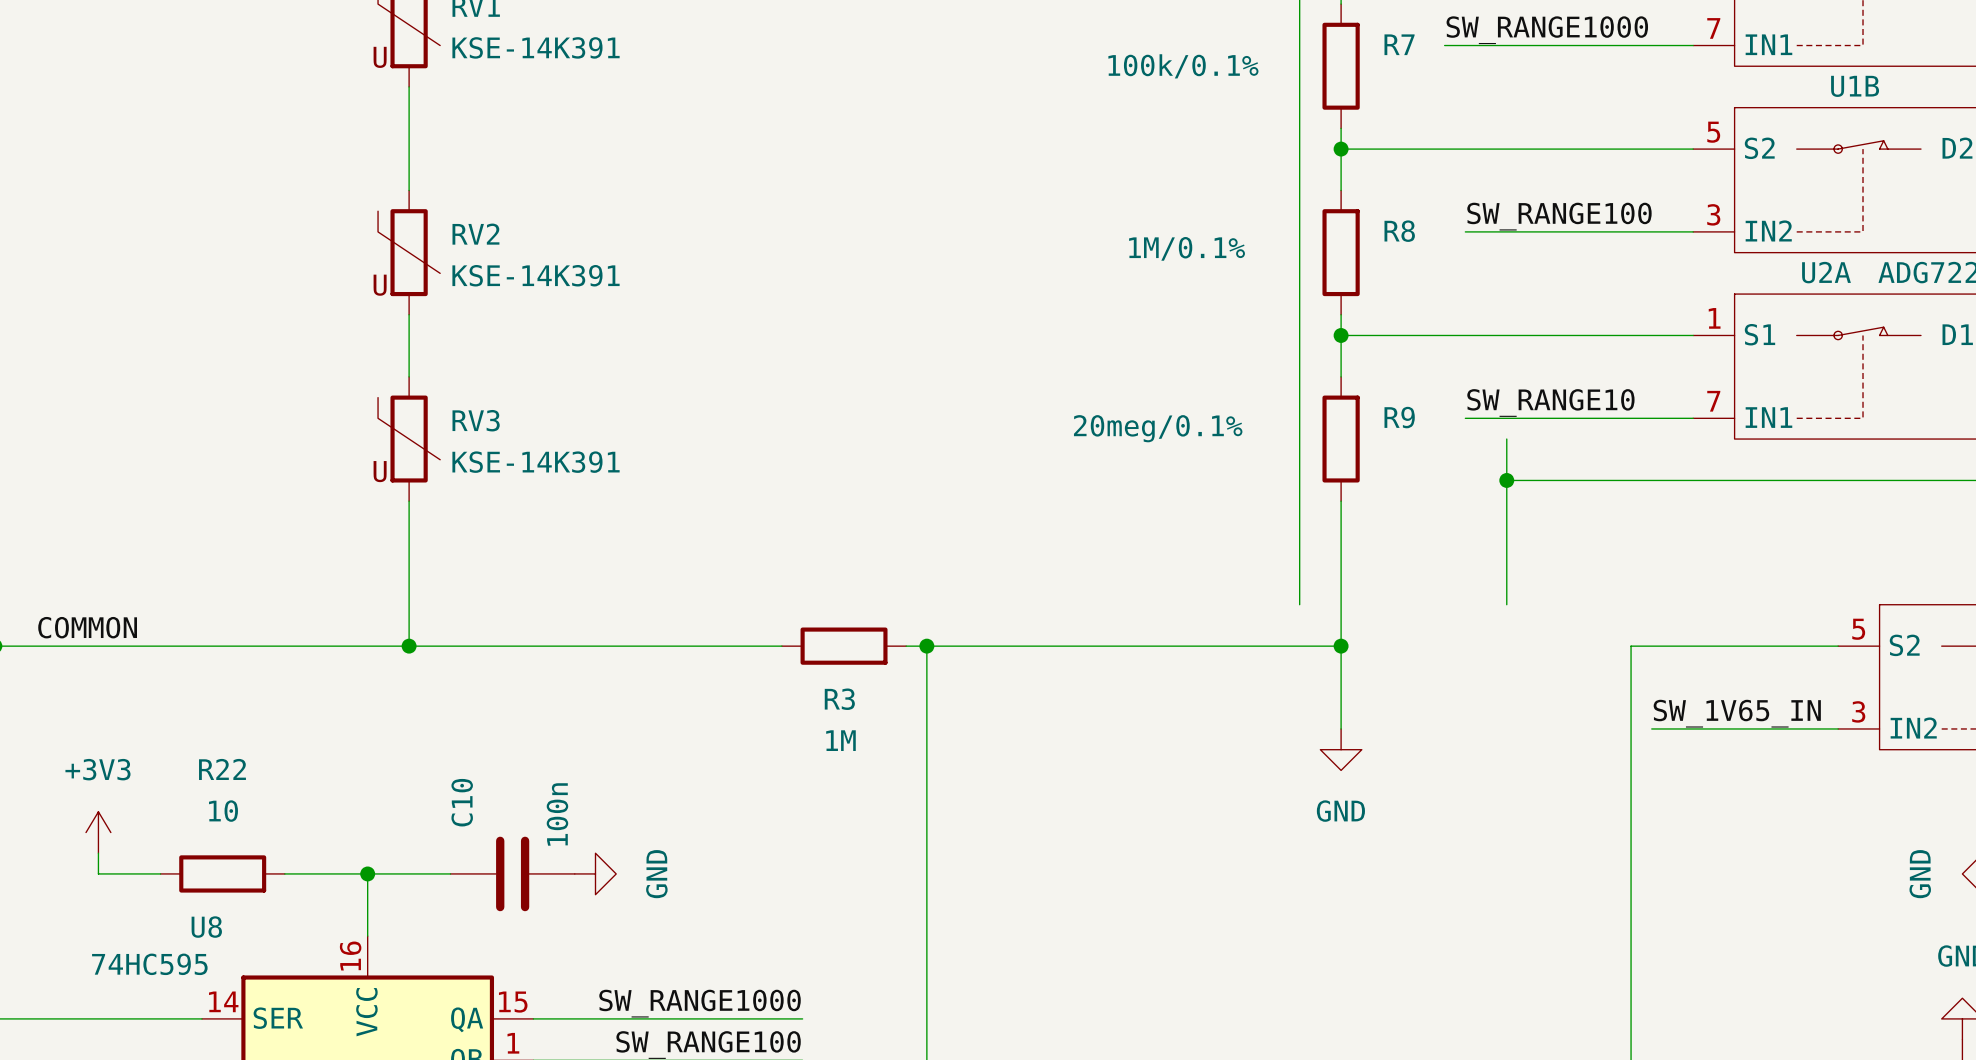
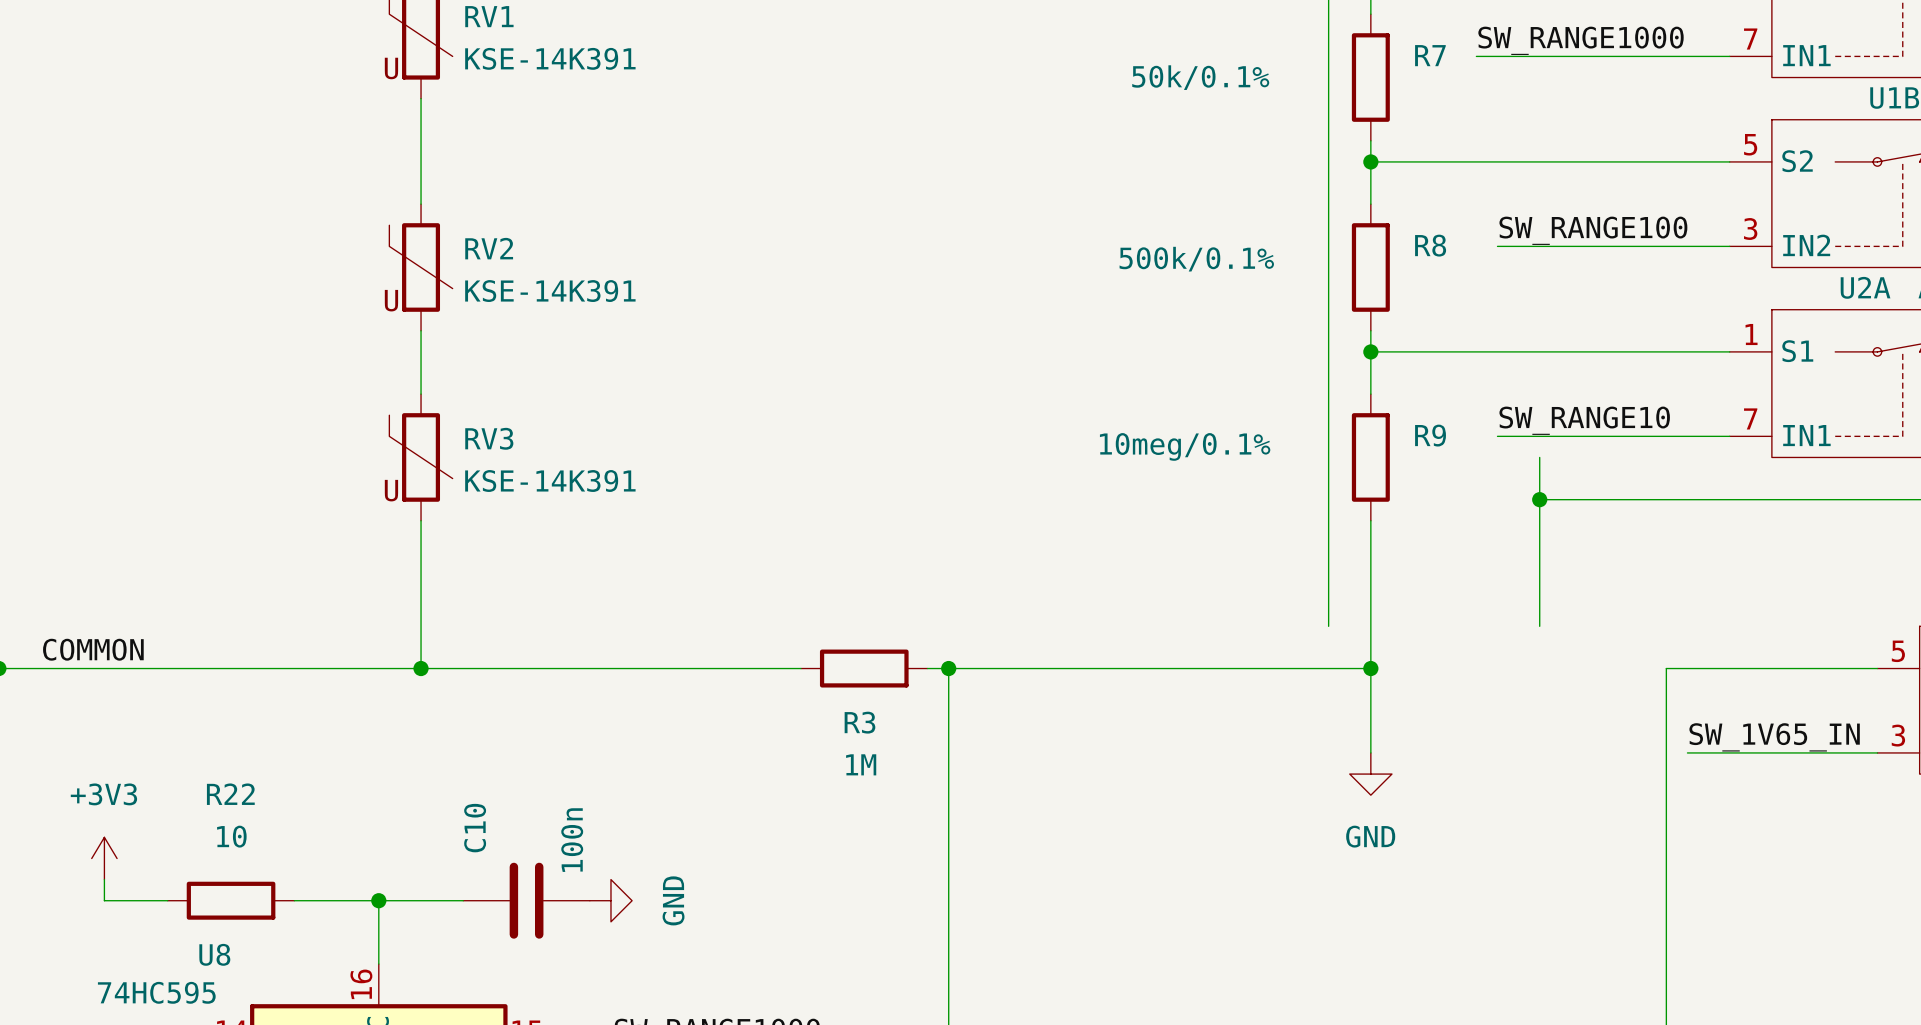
R7 value: 100k/0.1% (1183, 66) -> 50k/0.1% (1200, 77)
R8 value: 1M/0.1% (1187, 248) -> 500k/0.1% (1196, 259)
R9 value: 20meg/0.1% (1158, 428) -> 10meg/0.1% (1185, 446)

